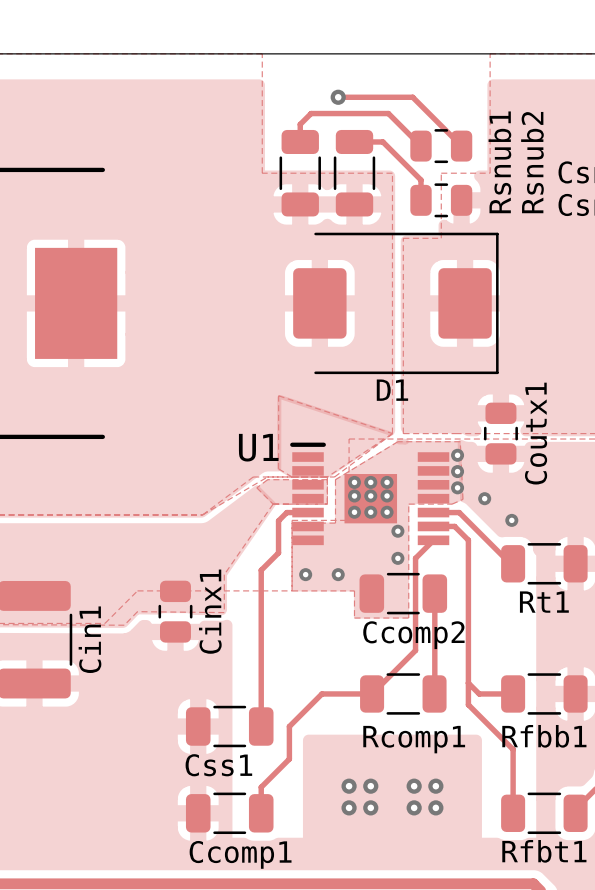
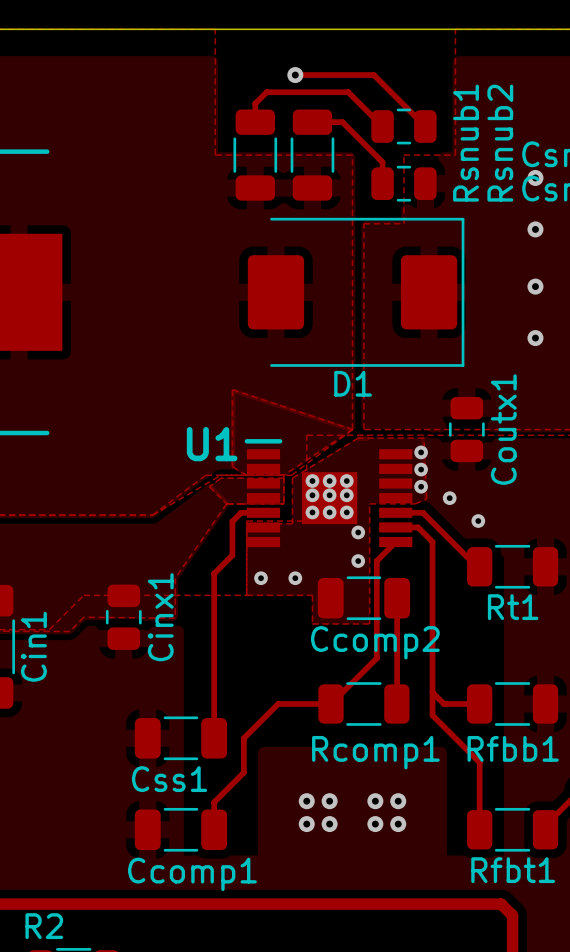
via: none -> (535, 177)
via: none -> (535, 229)
via: none -> (535, 286)
via: none -> (535, 338)

